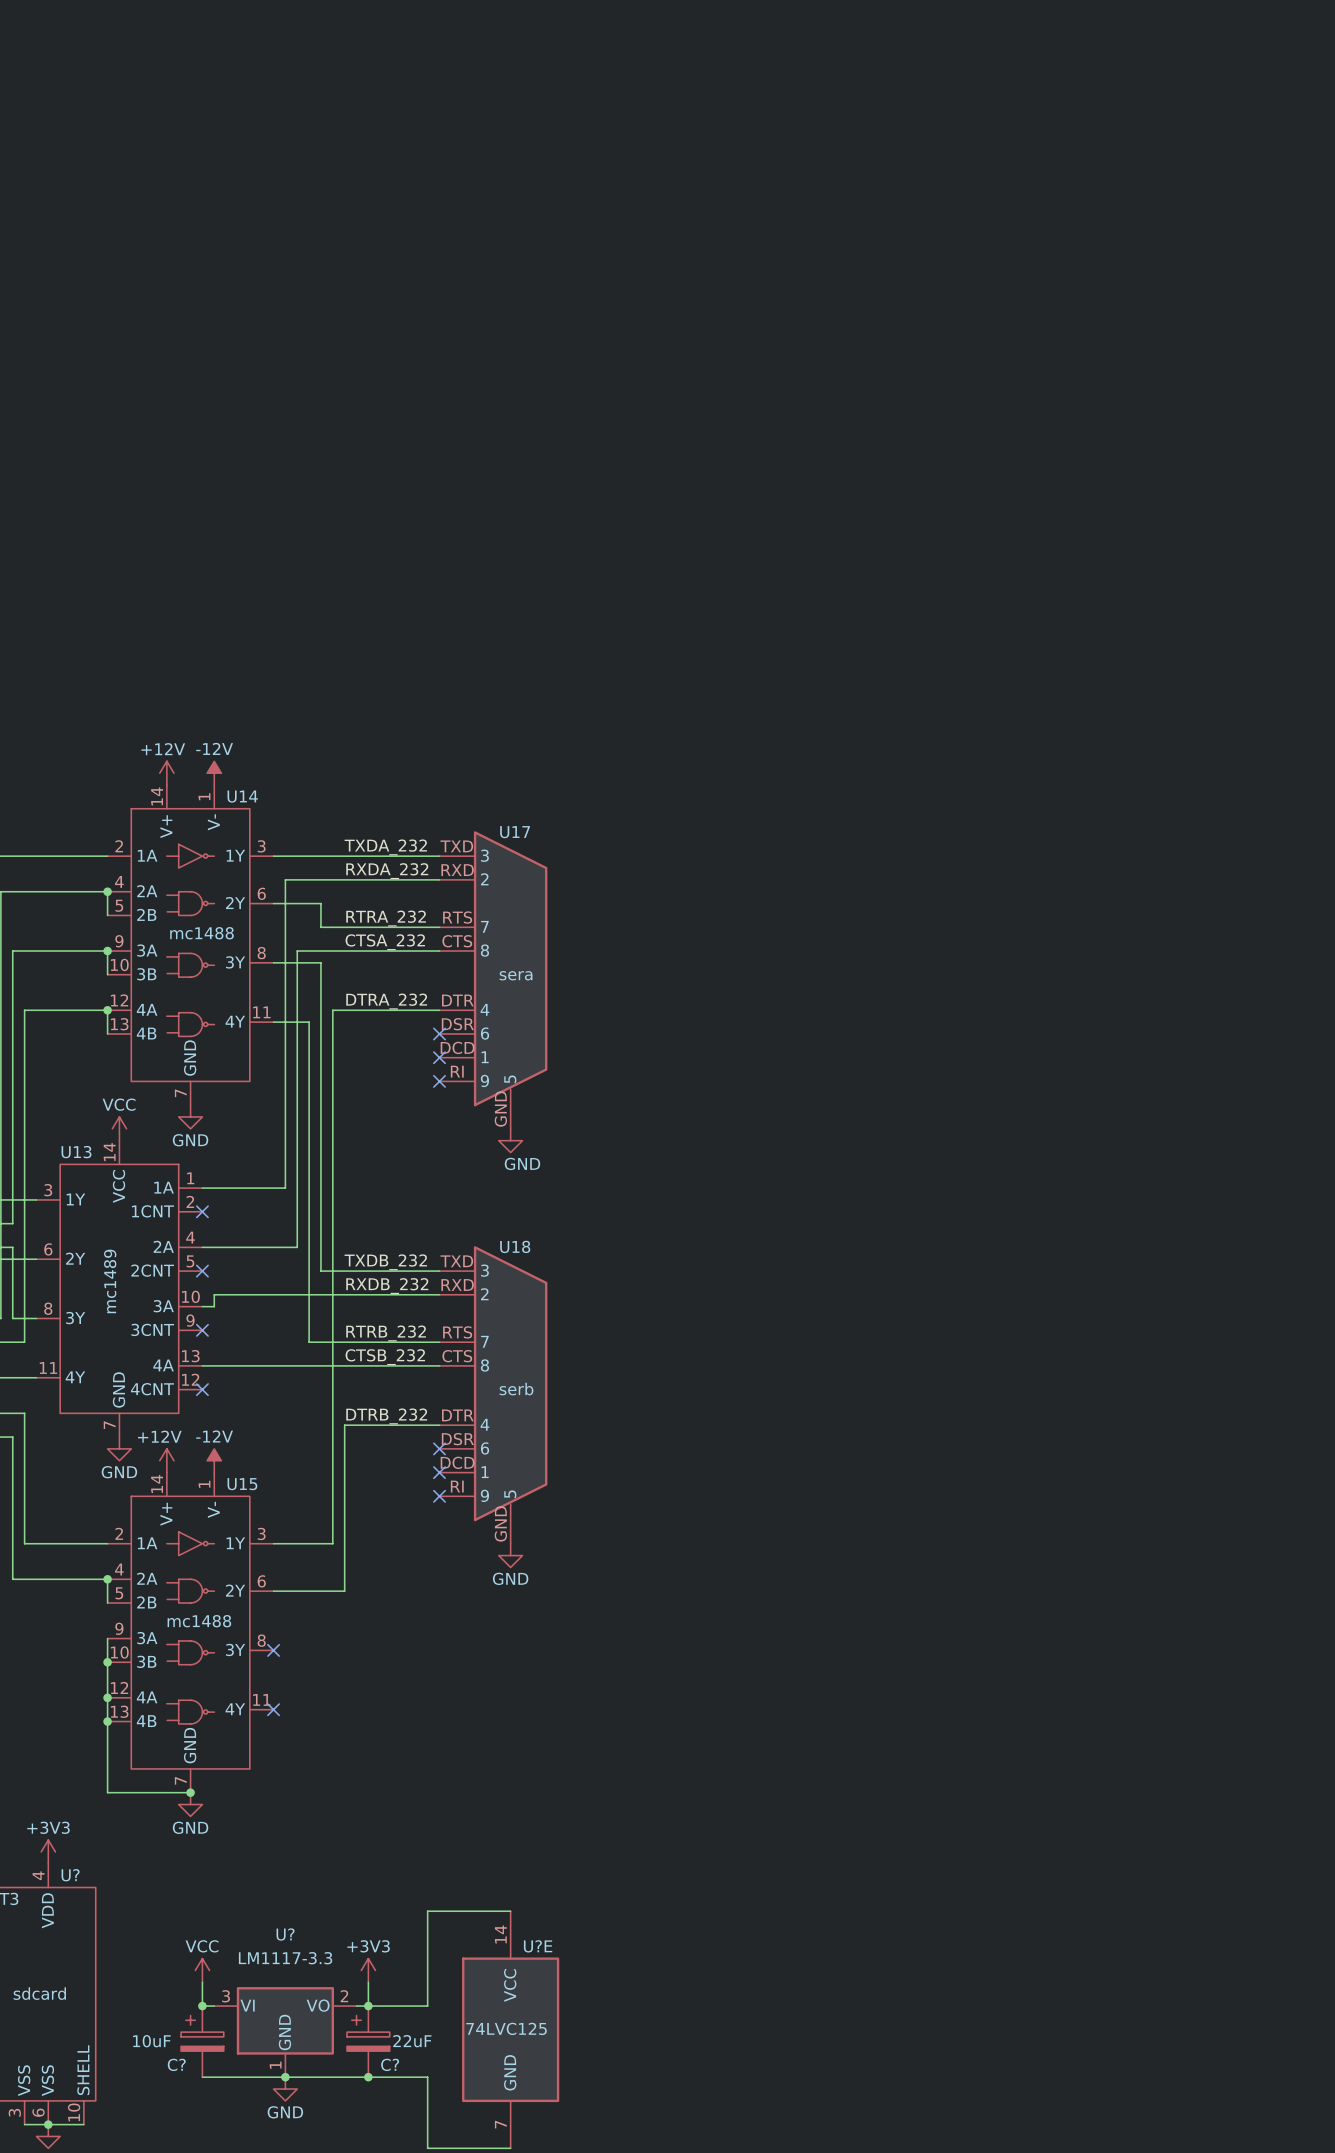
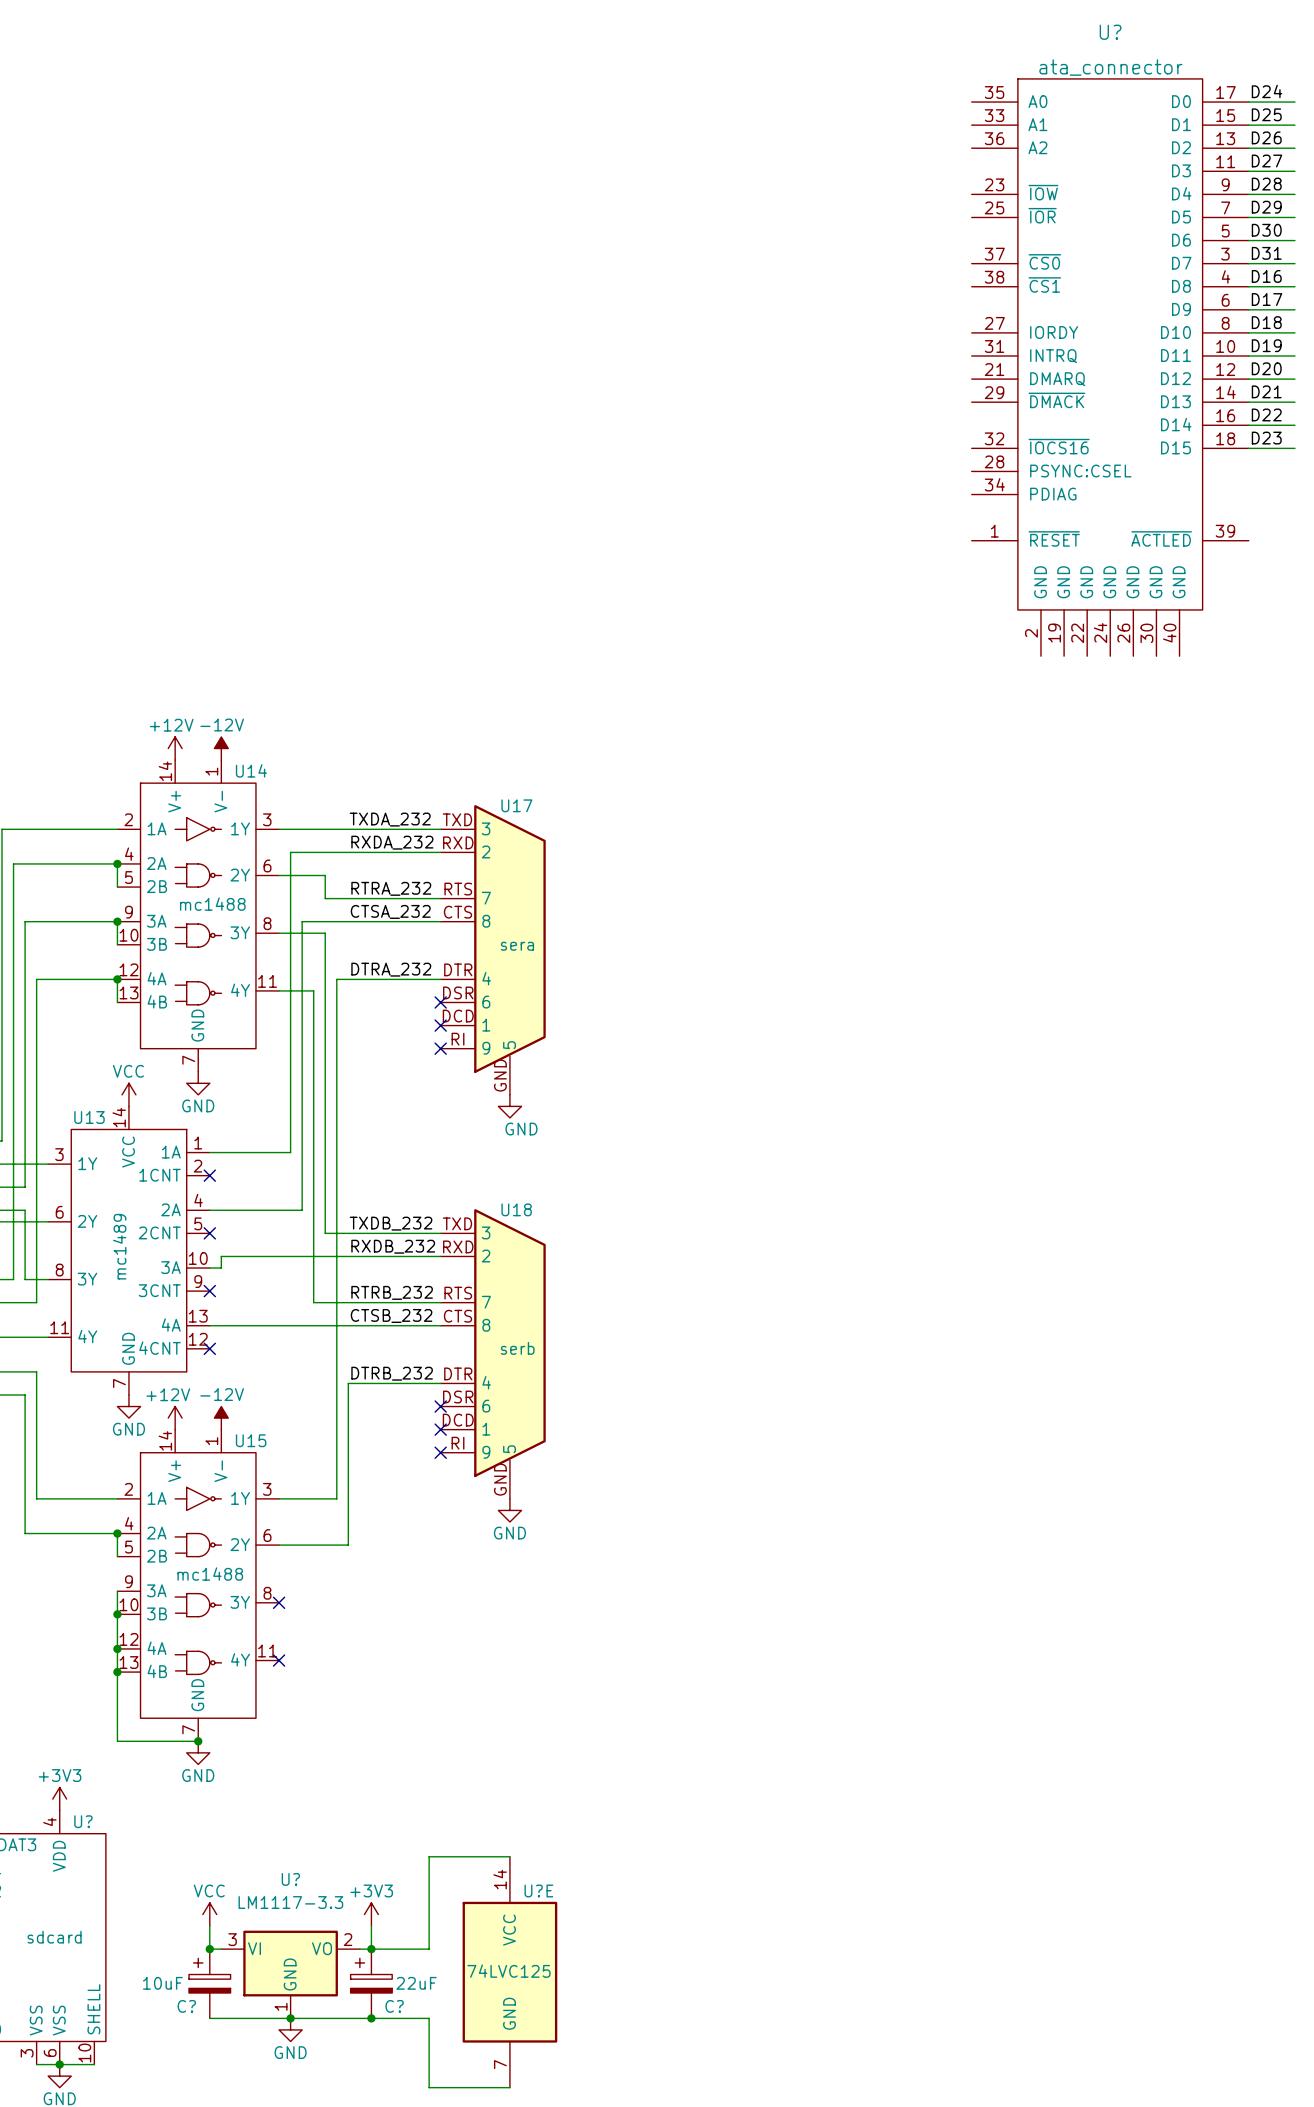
label: none -> D24 (1267, 91)
wire: none -> (1248, 102) (1294, 102)
label: none -> D25 (1266, 114)
wire: none -> (1248, 125) (1294, 125)
label: none -> D26 (1266, 137)
wire: none -> (1248, 148) (1294, 148)
label: none -> D27 (1267, 160)
wire: none -> (1248, 171) (1294, 171)
label: none -> D28 (1266, 184)
wire: none -> (1248, 194) (1294, 194)
label: none -> D29 (1266, 207)
wire: none -> (1248, 217) (1294, 217)
label: none -> D30 (1266, 230)
wire: none -> (1248, 240) (1294, 240)
label: none -> D31 (1266, 253)
wire: none -> (1248, 263) (1294, 263)
label: none -> D16 (1266, 276)
wire: none -> (1248, 286) (1294, 286)
label: none -> D17 (1267, 299)
wire: none -> (1248, 309) (1294, 309)
label: none -> D18 (1266, 322)
wire: none -> (1248, 332) (1294, 332)
label: none -> D19 (1266, 345)
wire: none -> (1248, 356) (1294, 356)
U?: none -> ata_connector (1110, 367)
label: none -> D20 (1266, 368)
wire: none -> (1248, 379) (1294, 379)
label: none -> D21 (1266, 391)
wire: none -> (1248, 402) (1294, 402)
label: none -> D22 (1266, 414)
wire: none -> (1248, 425) (1294, 425)
label: none -> D23 (1266, 438)
wire: none -> (1248, 448) (1294, 448)

